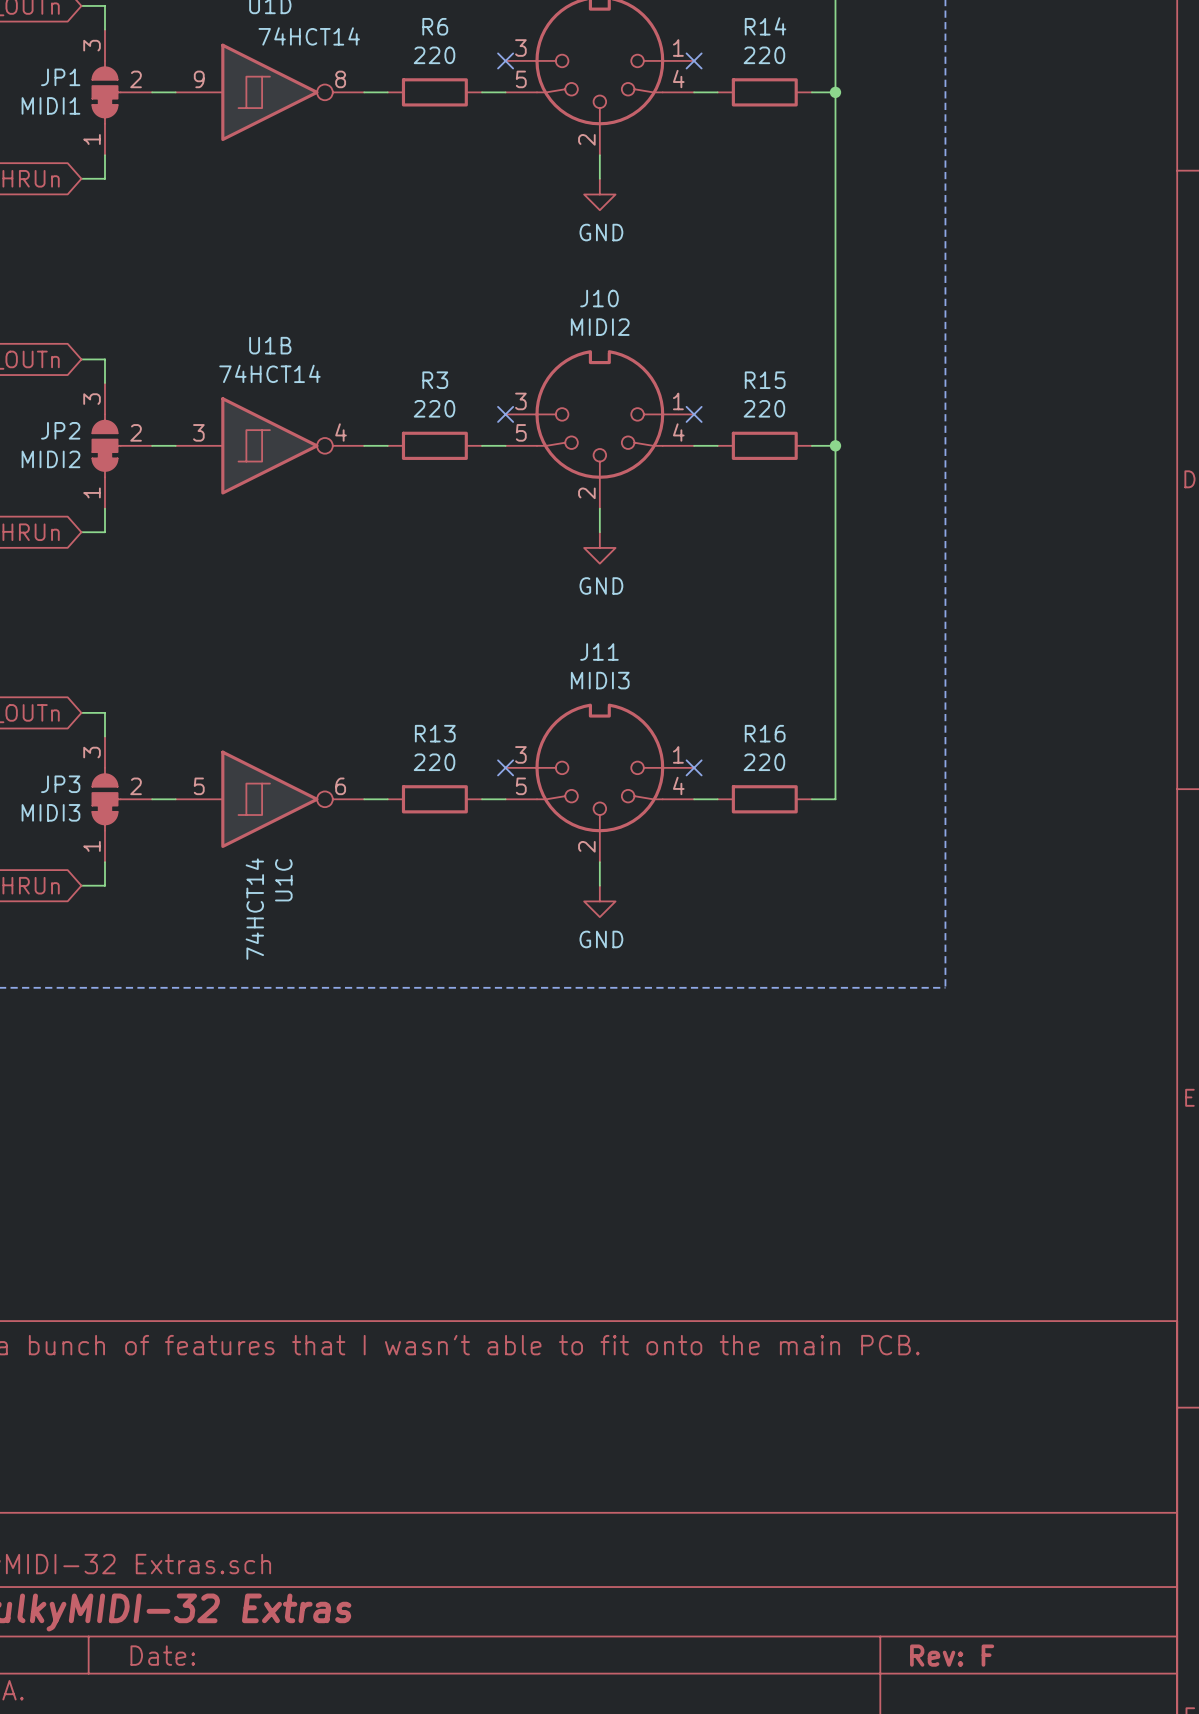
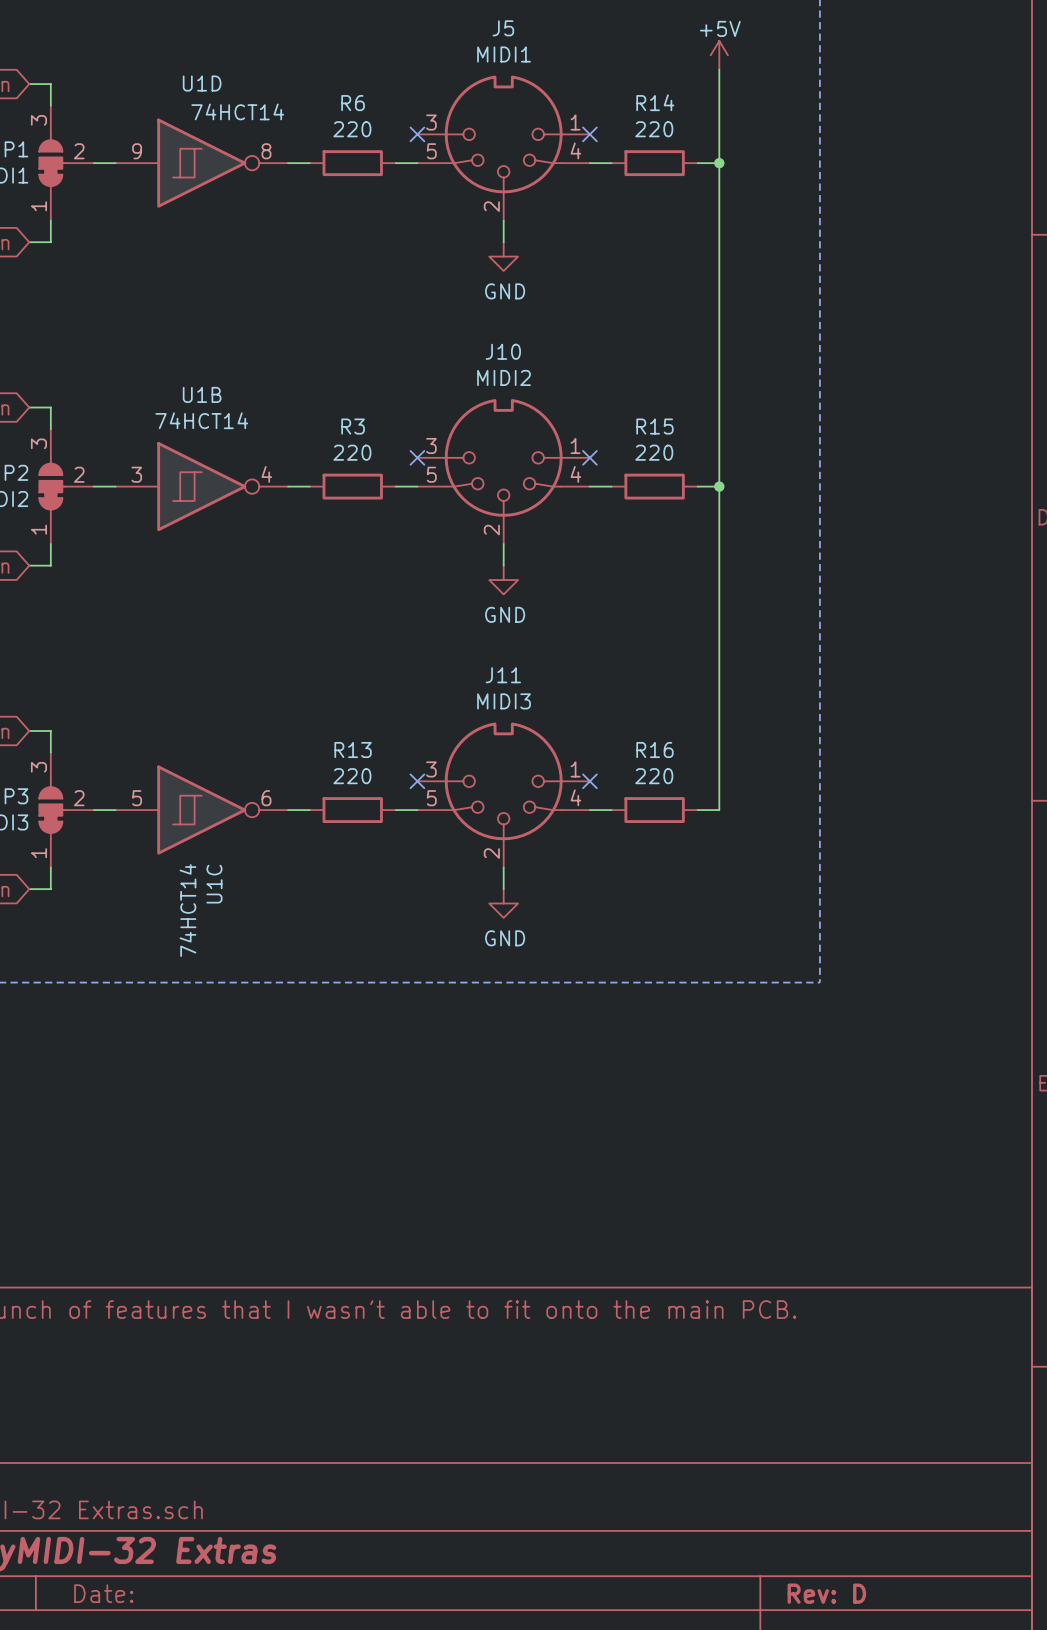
title block: Rev: F (952, 1655) -> Rev: D (826, 1593)

